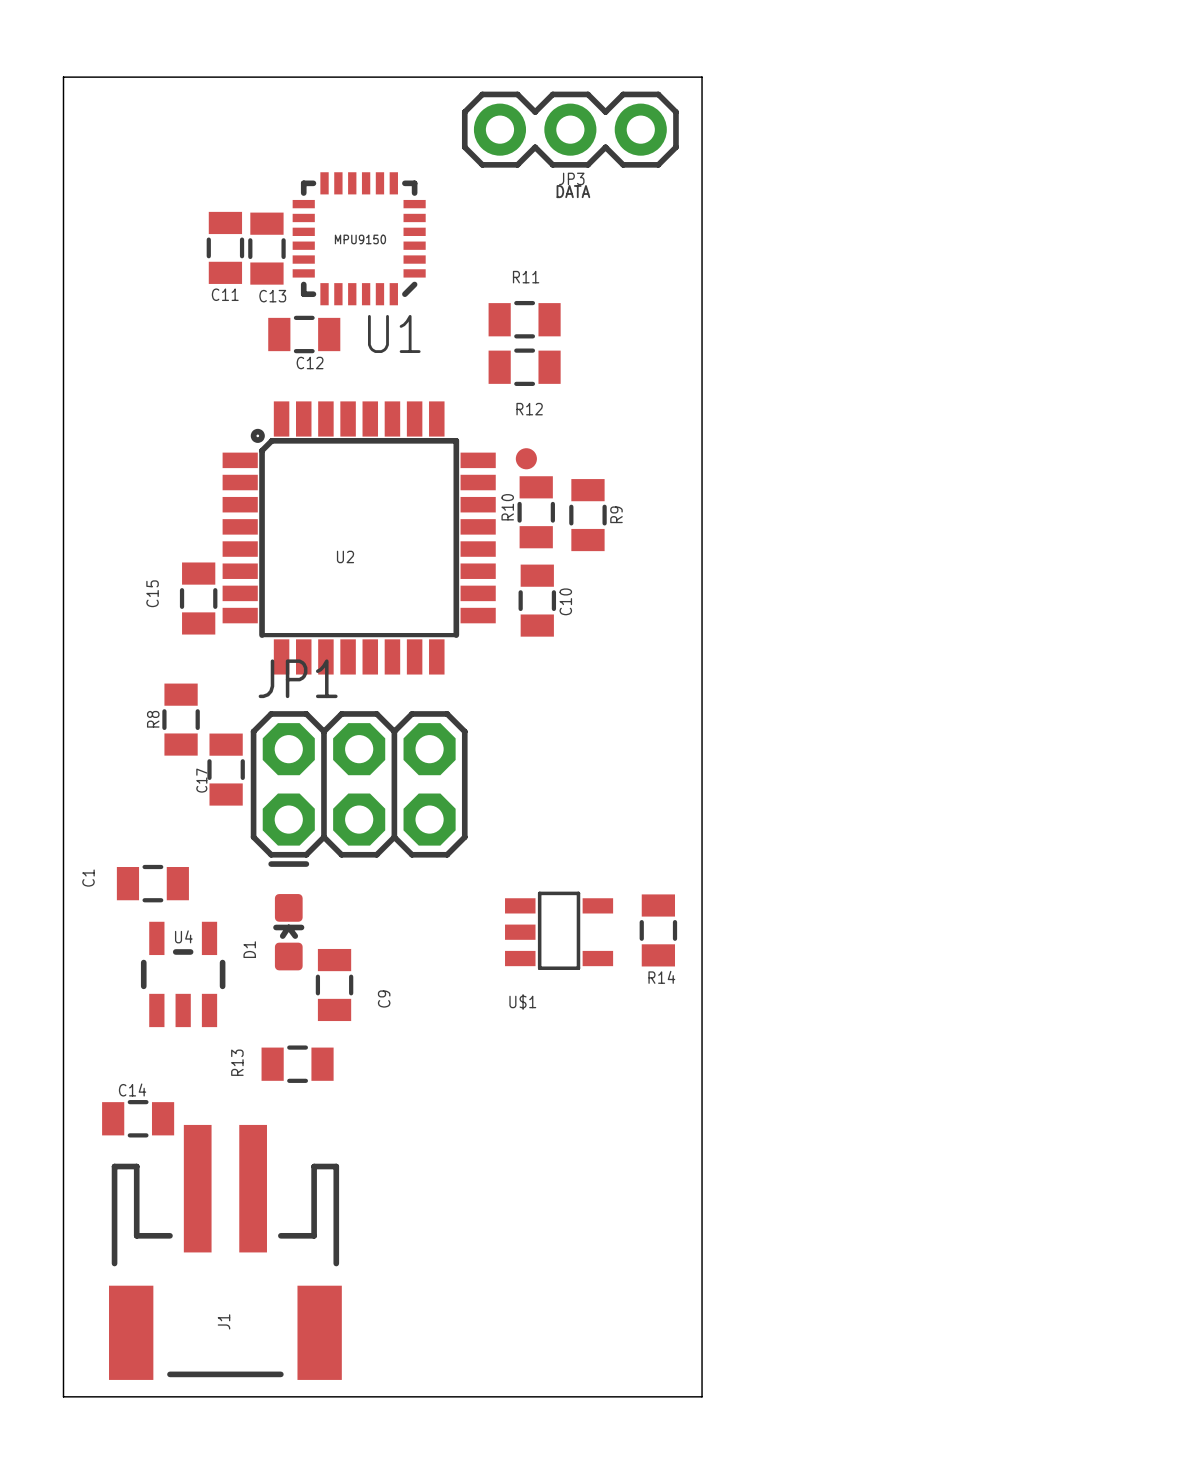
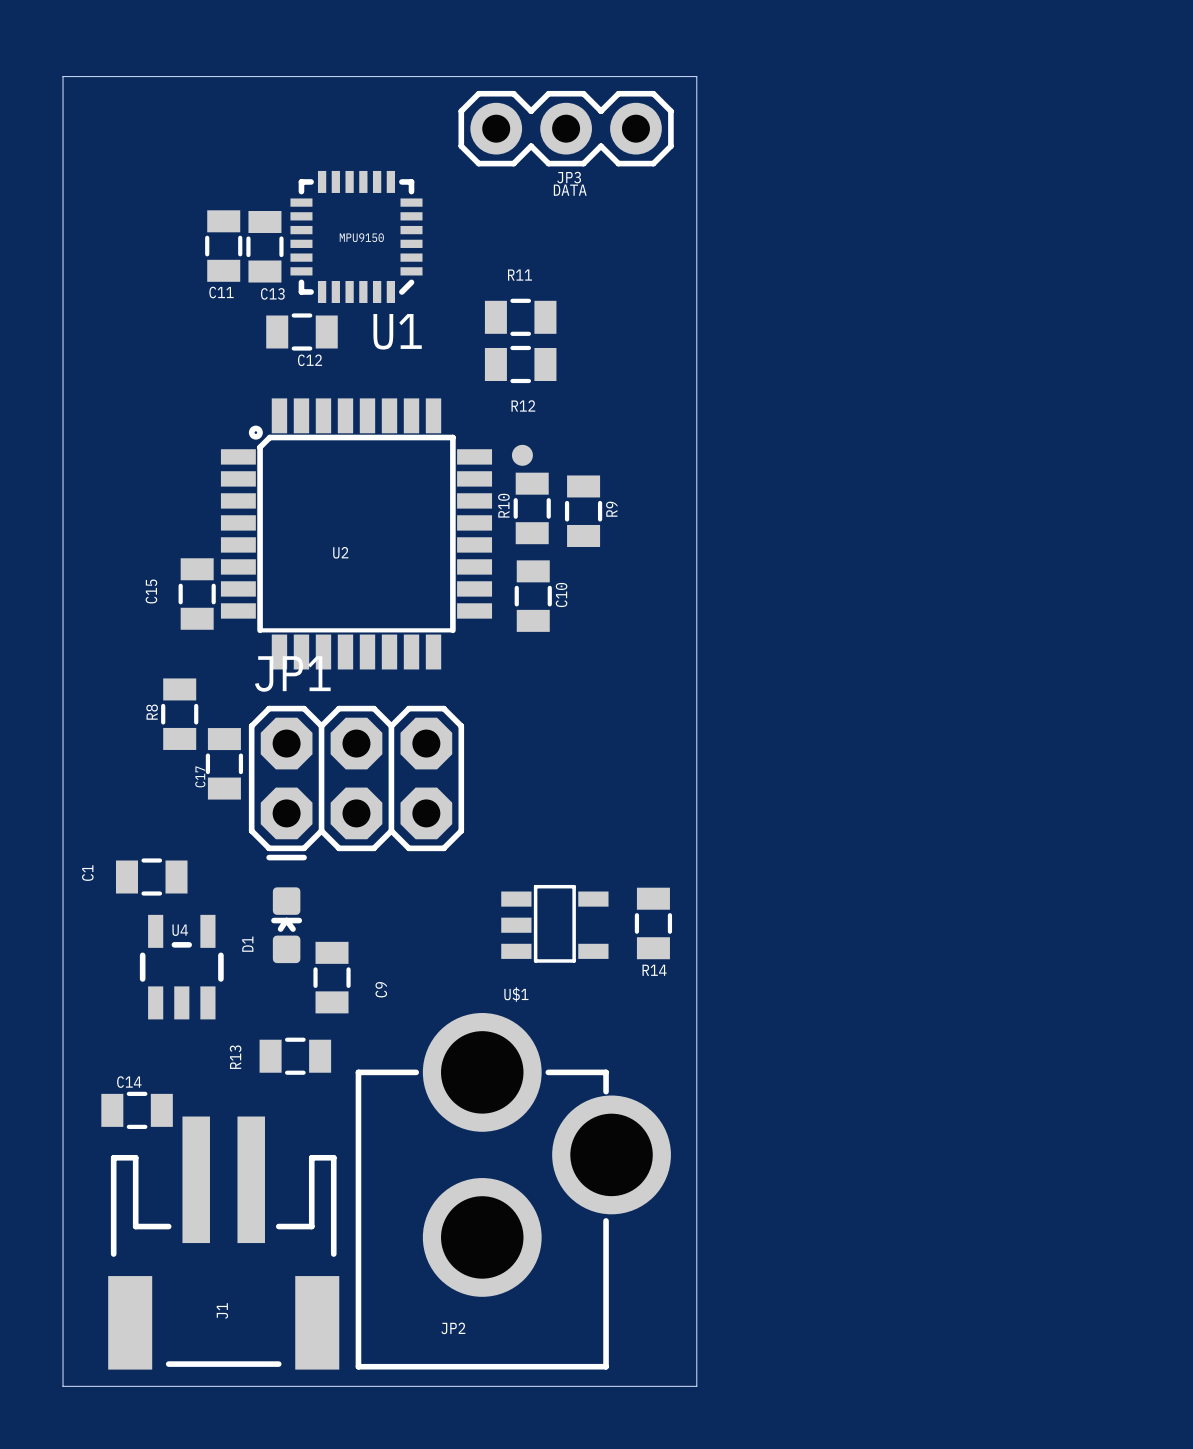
JP2: none -> (513, 1191)

